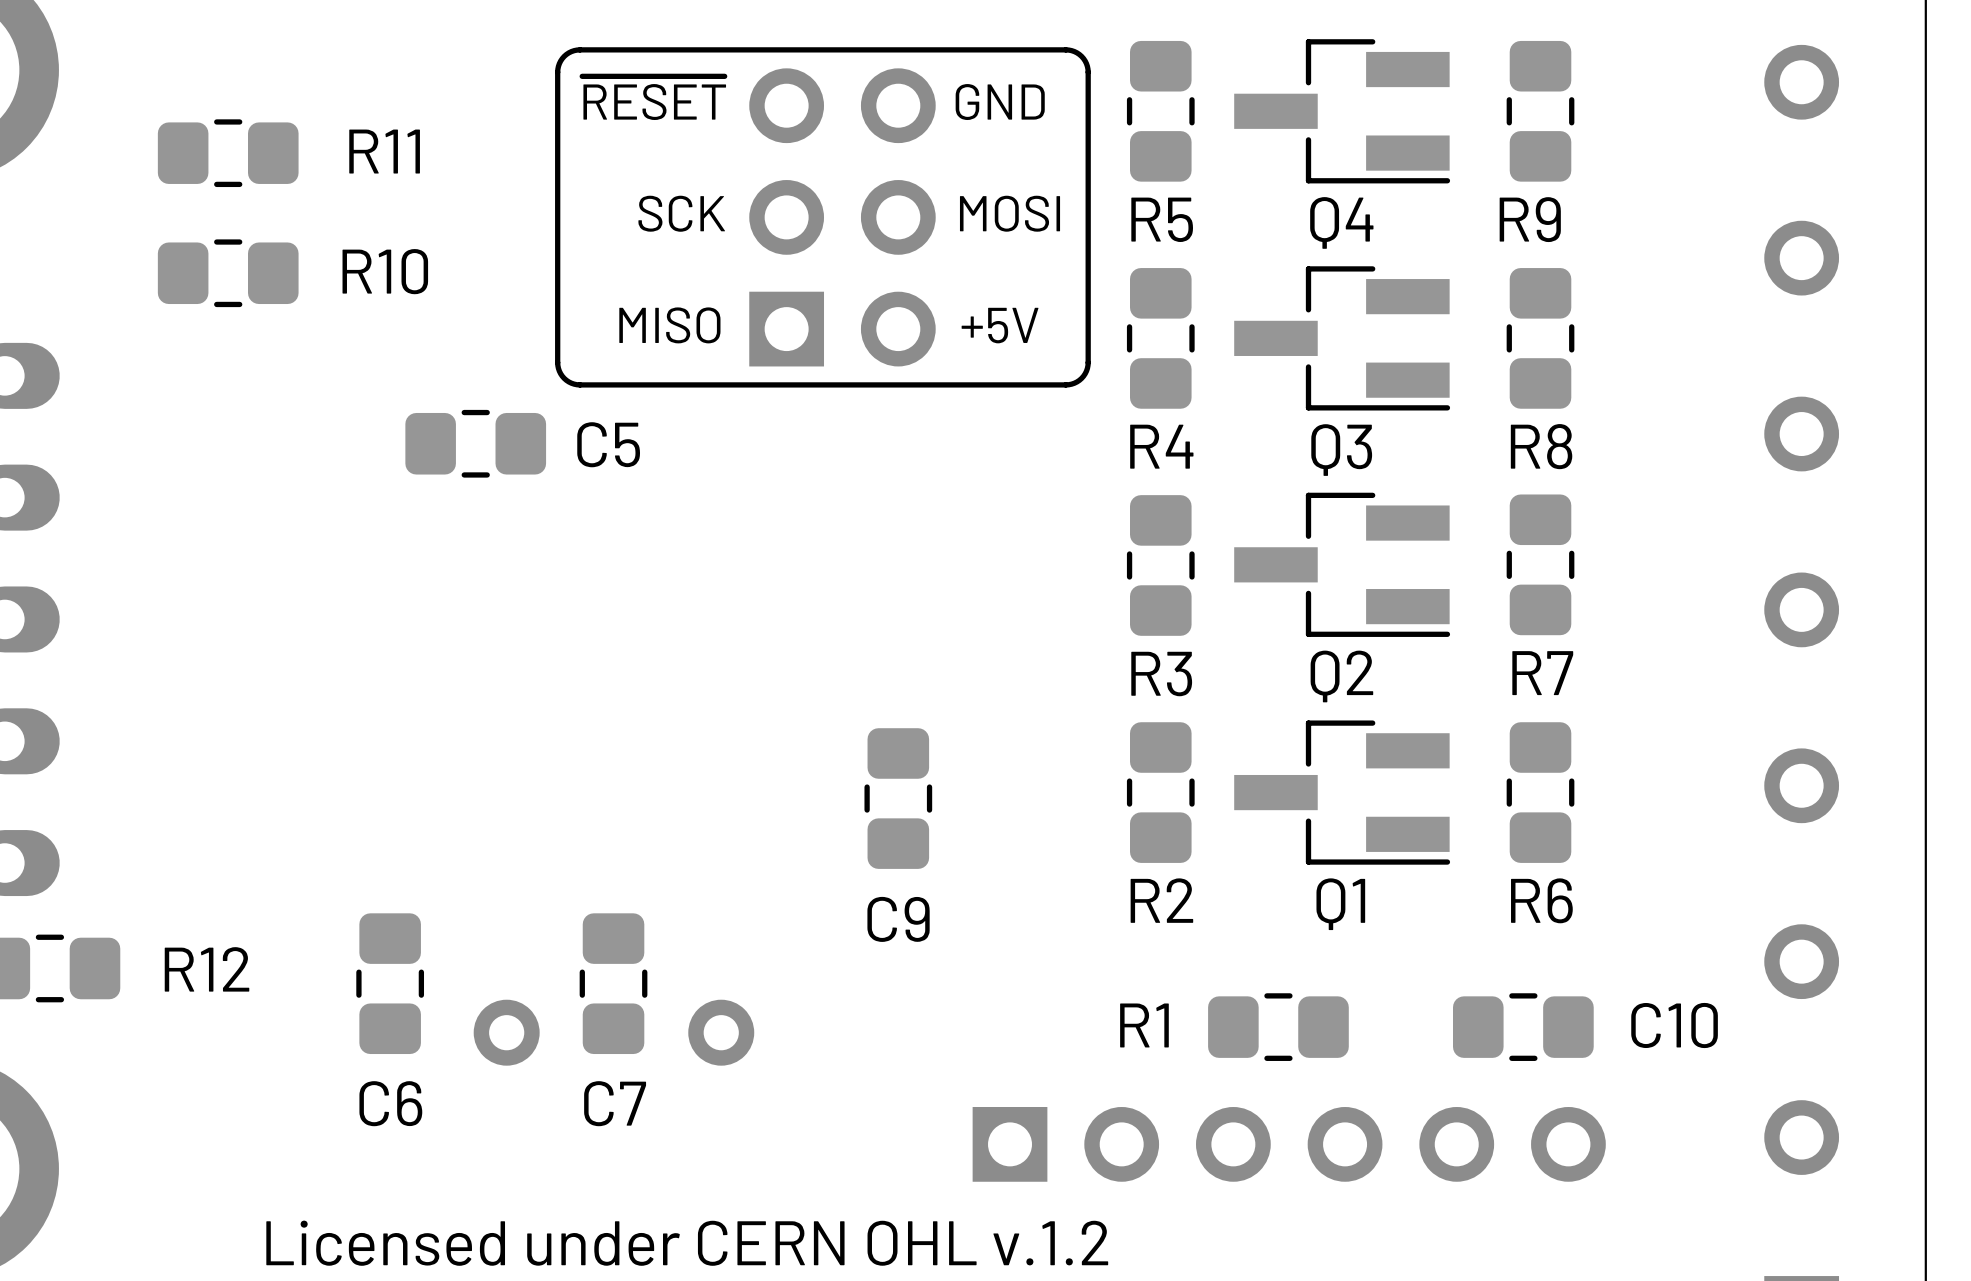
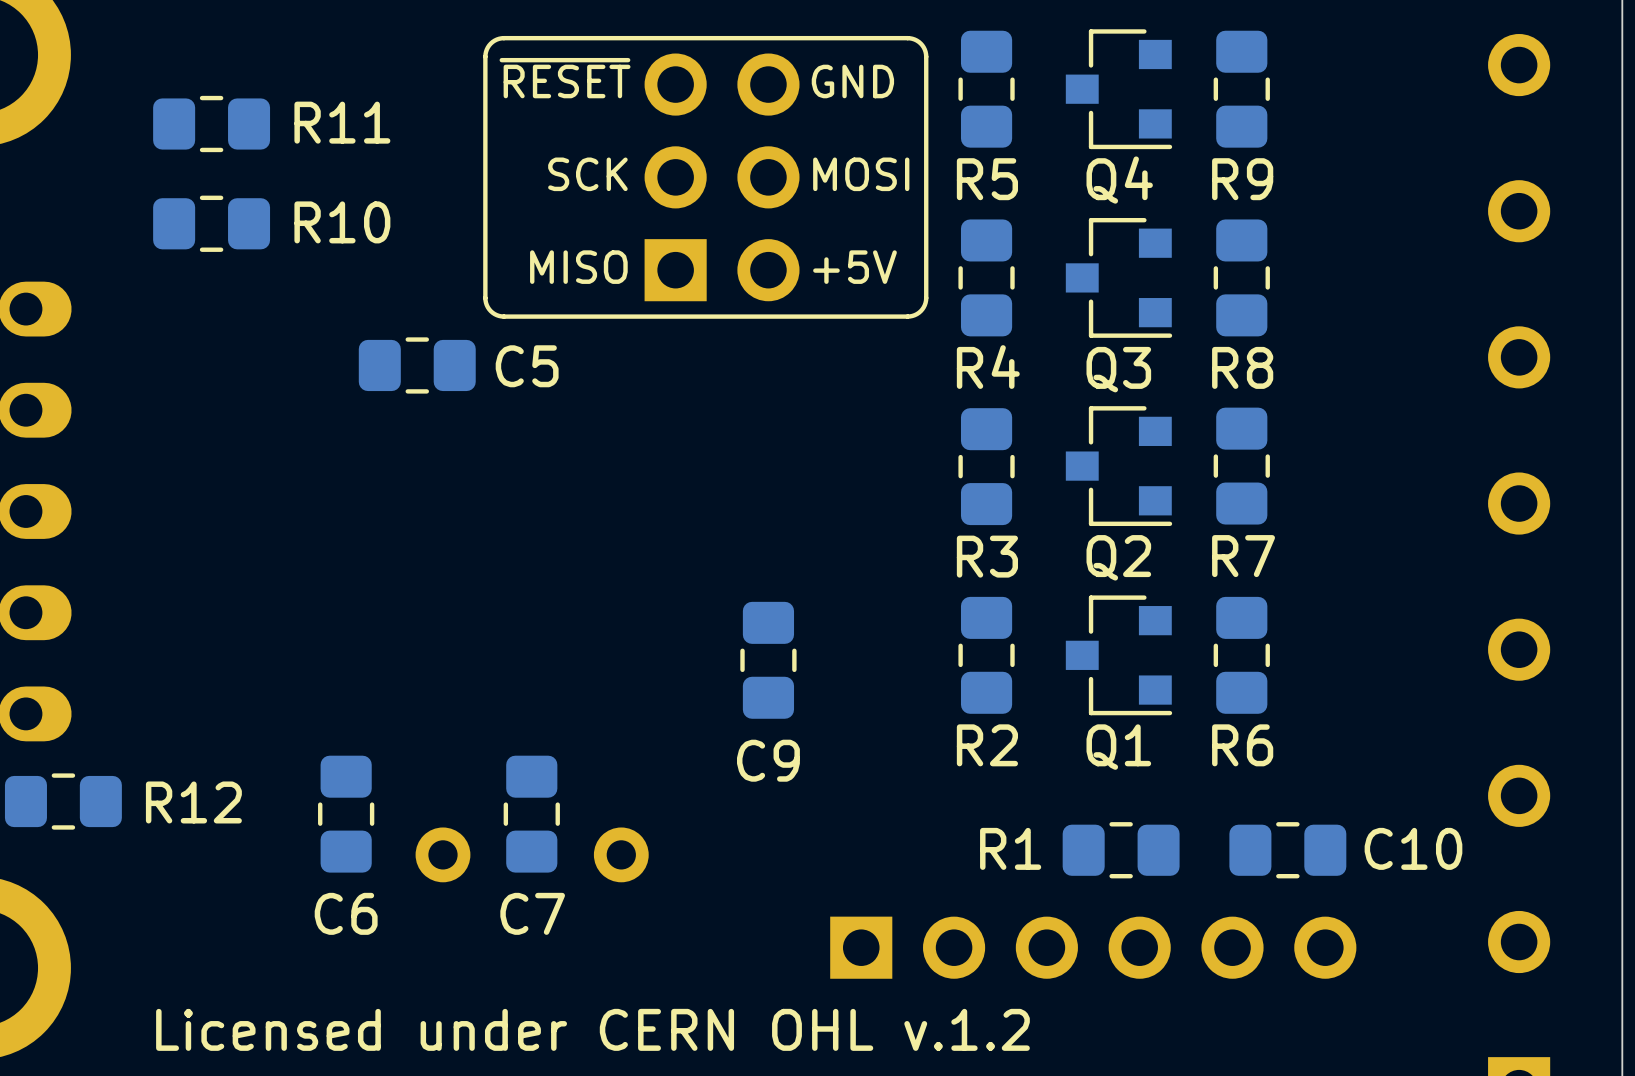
Q4 footprint: [1234, 39, 1451, 184] -> [1065, 29, 1173, 150]
R9 position: (1540, 111) -> (1241, 89)
R9 name position: R9 (1530, 219) -> R9 (1242, 179)
Q3 footprint: [1234, 266, 1451, 411] -> [1065, 217, 1173, 338]
R8 position: (1540, 338) -> (1241, 277)
Q2 footprint: [1234, 492, 1451, 637] -> [1065, 406, 1173, 527]
R7 position: (1540, 564) -> (1241, 466)
Q1 footprint: [1234, 720, 1451, 865] -> [1065, 595, 1173, 716]
R6 position: (1540, 792) -> (1241, 655)
R1 position: (1278, 1027) -> (1121, 850)

